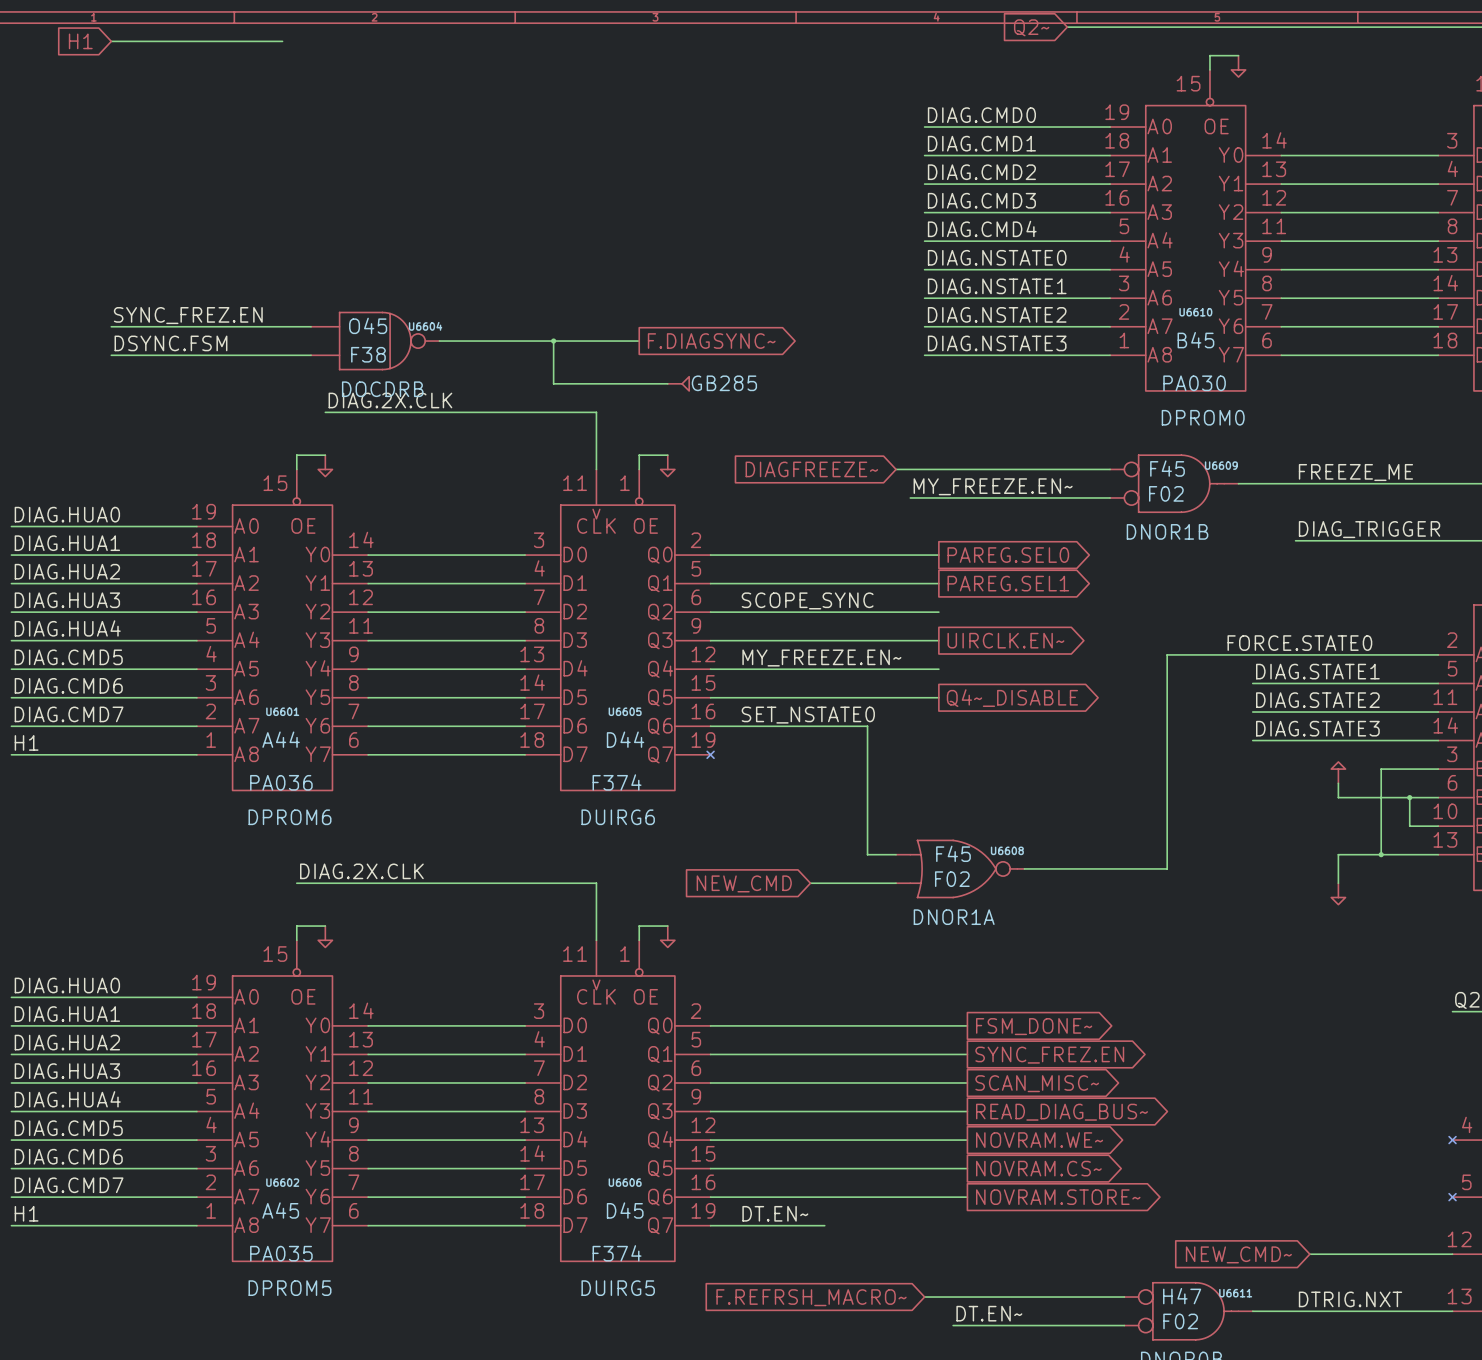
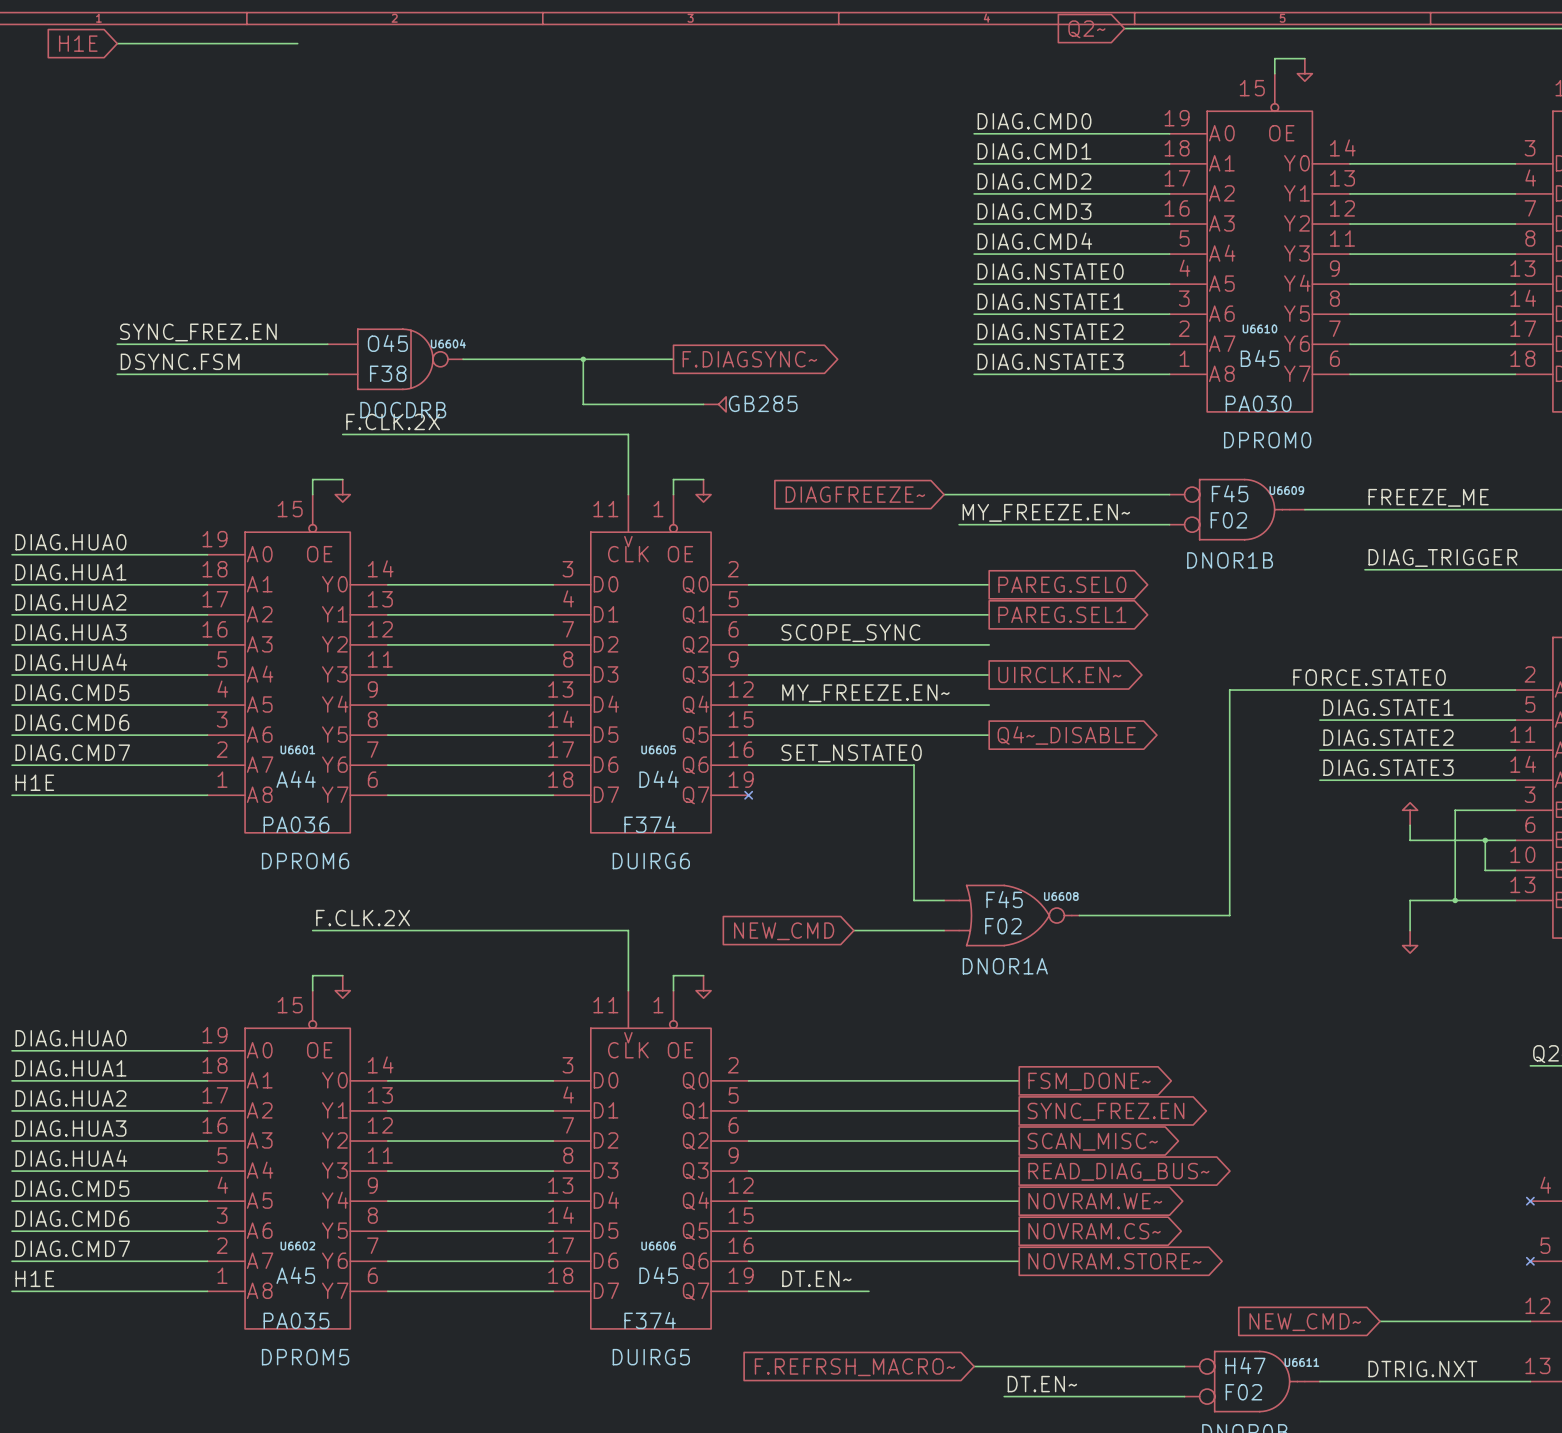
global label: H1 (80, 41) -> H1E (78, 43)
label: DIAG.2X.CLK (390, 400) -> F.CLK.2X (393, 421)
label: H1 (26, 742) -> H1E (34, 782)
label: DIAG.2X.CLK (361, 871) -> F.CLK.2X (363, 918)
label: H1 (26, 1213) -> H1E (34, 1278)

